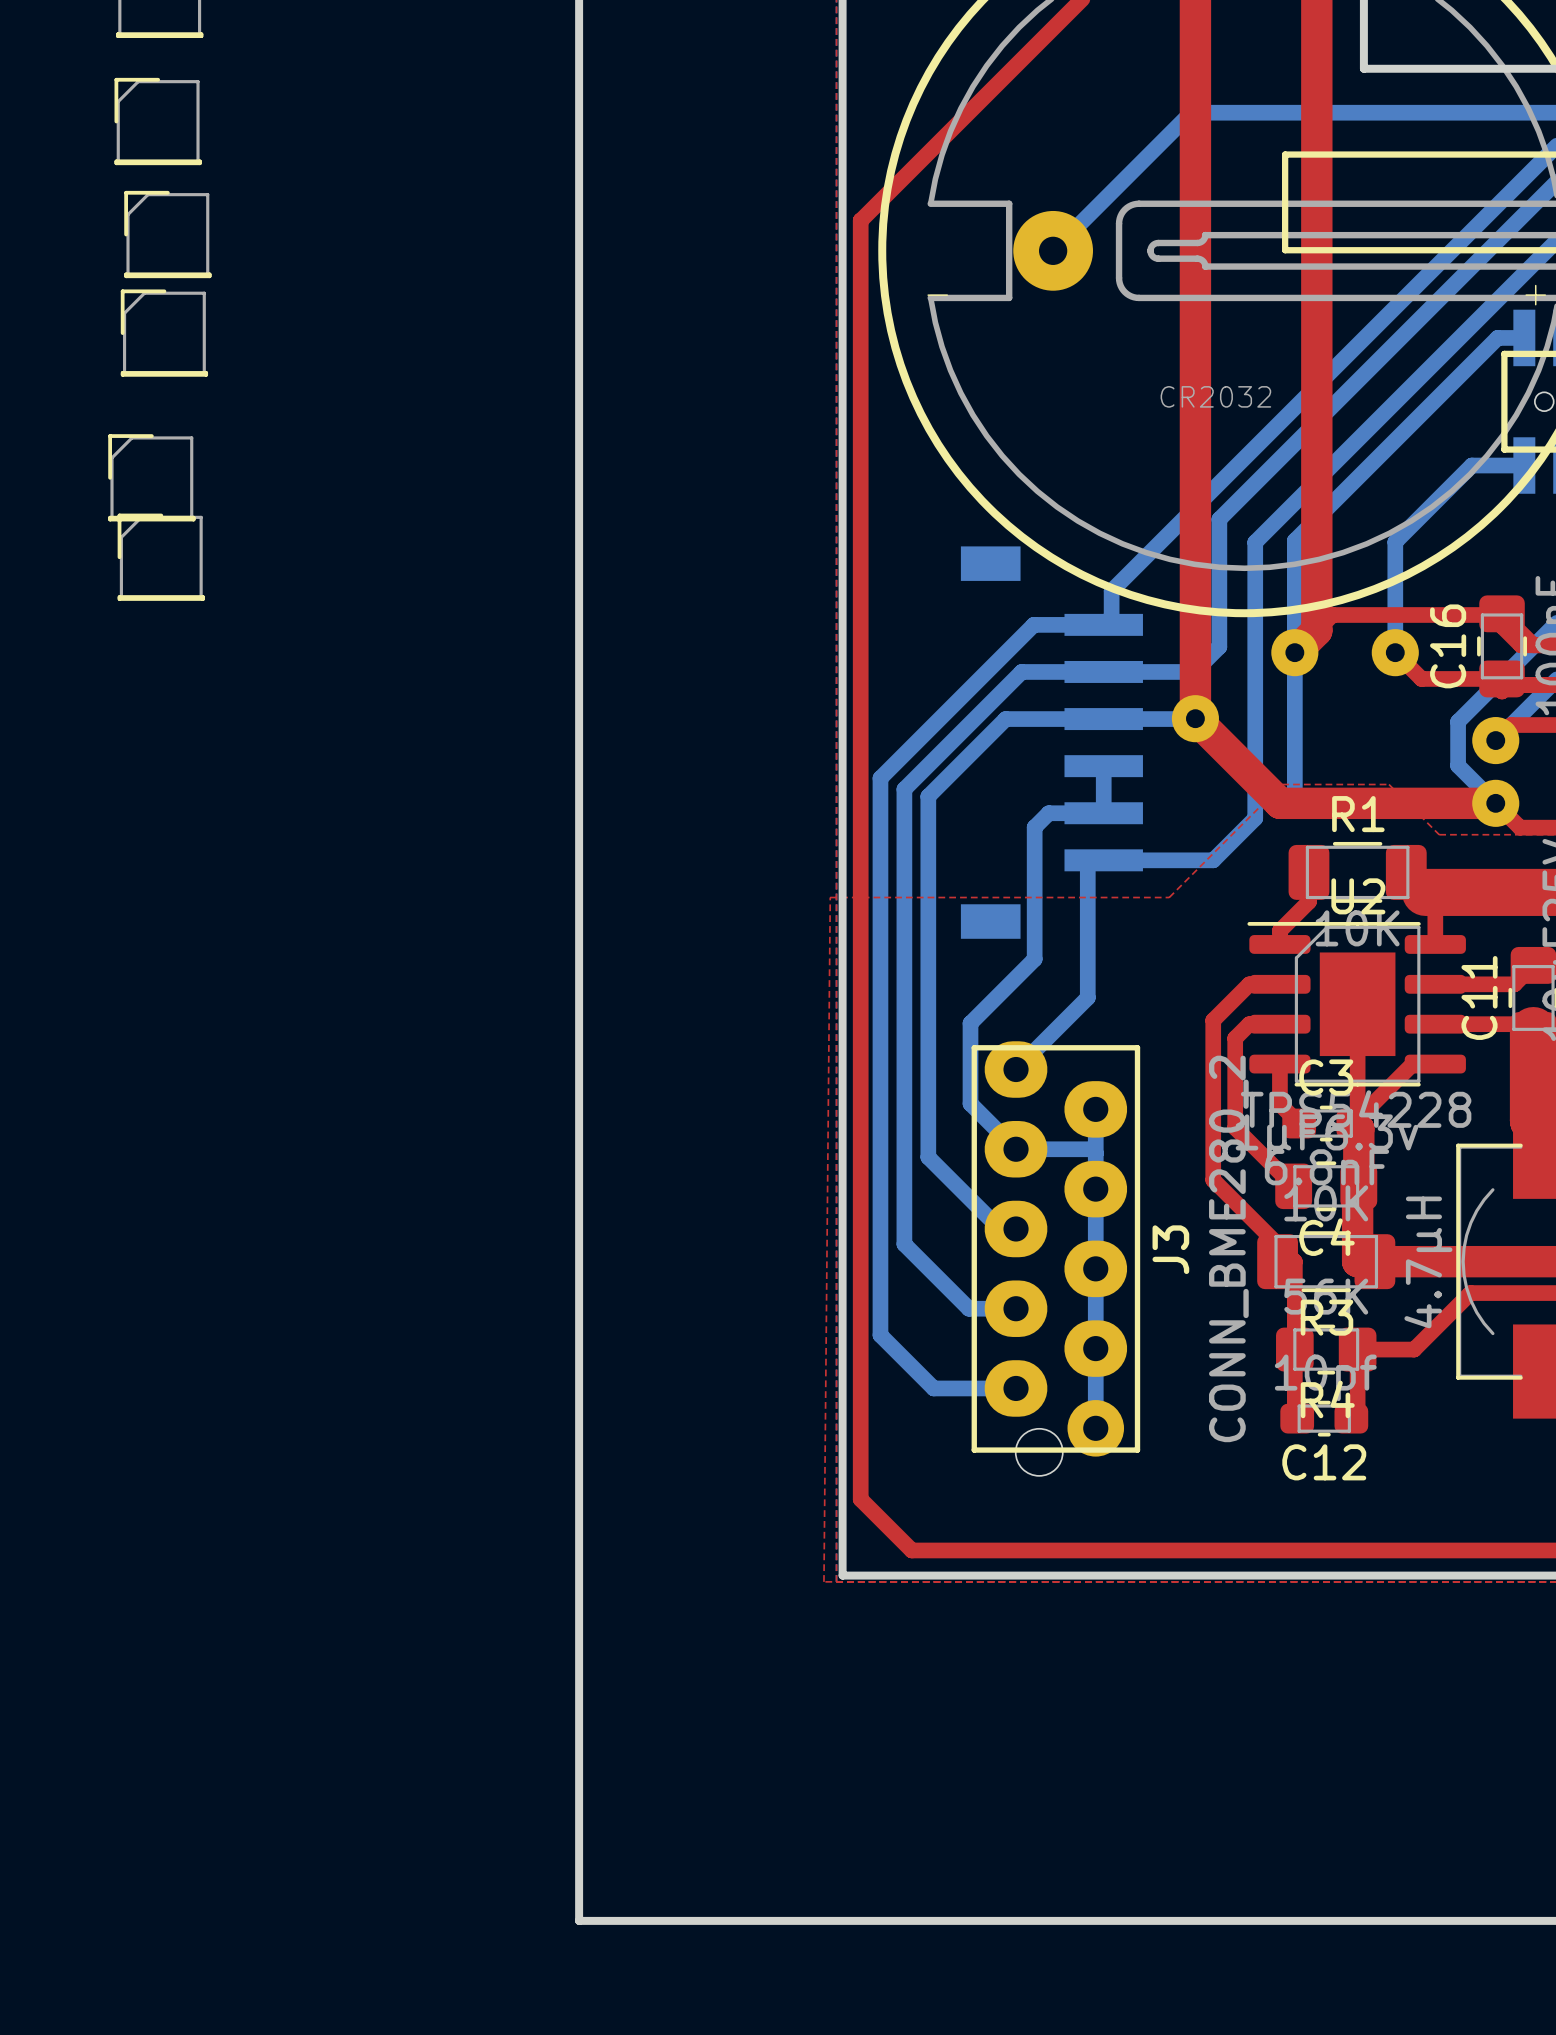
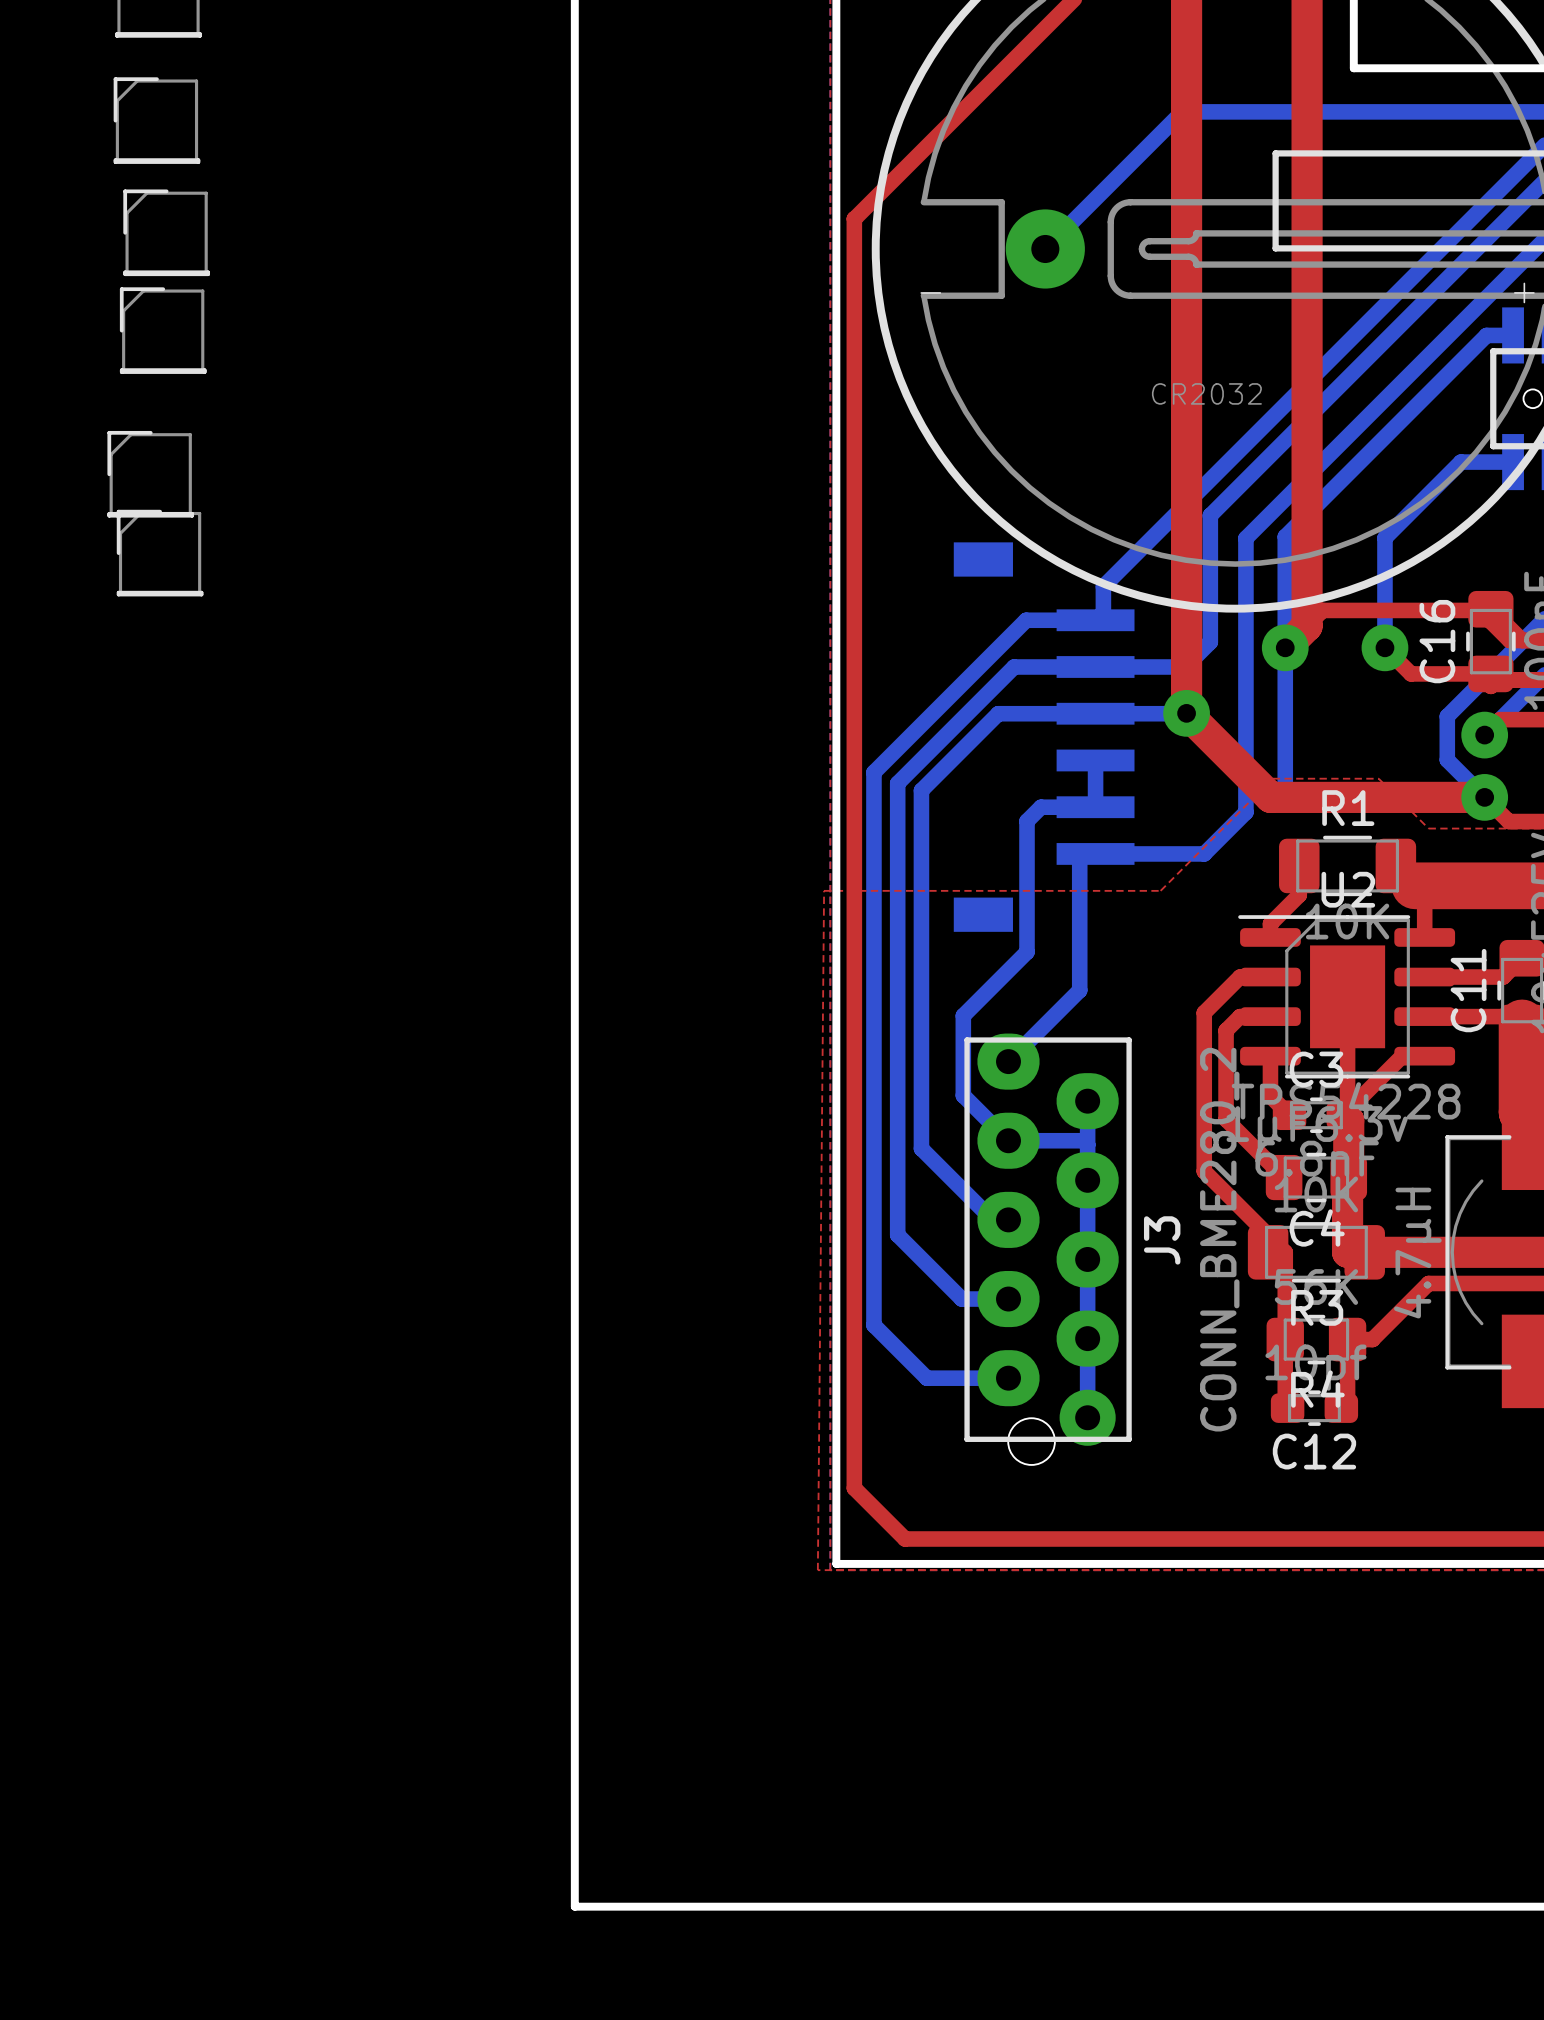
top track: (1470, 1293) (1414, 1349) (1382, 1349) -> (1459, 1283) (1428, 1283) (1372, 1339)

